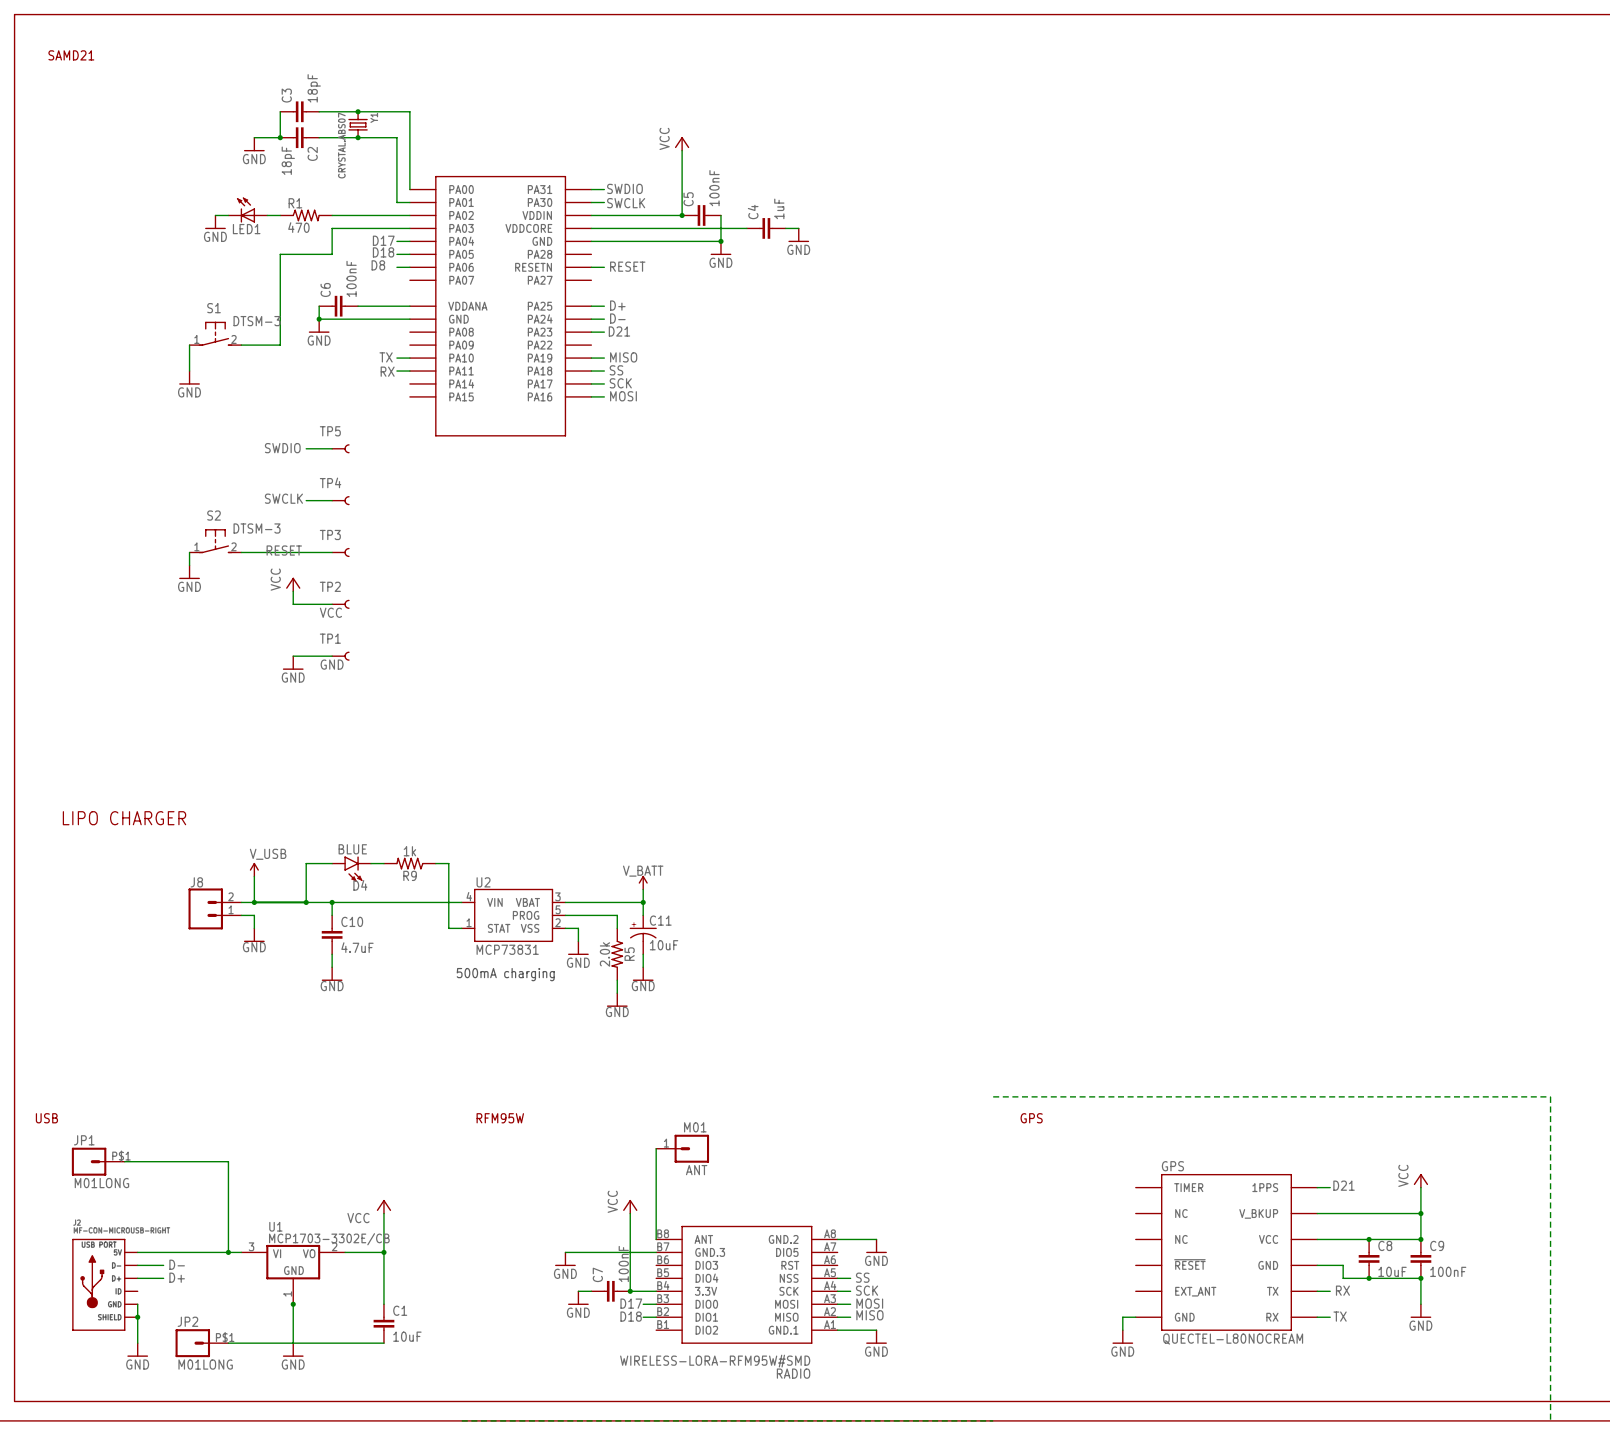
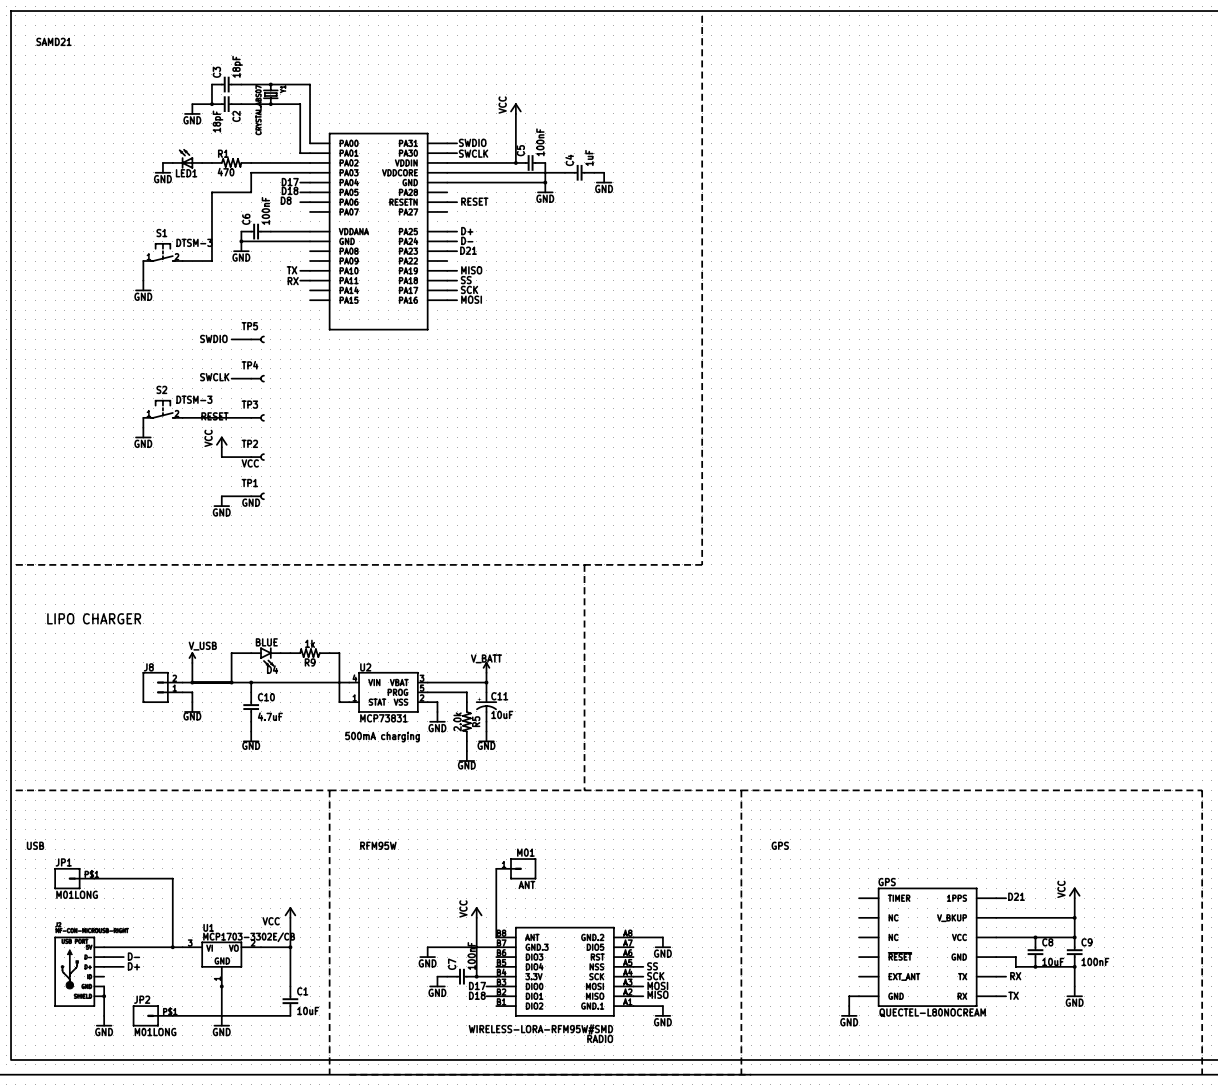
line: none -> (702, 15) (702, 564) (15, 564)
line: none -> (584, 564) (584, 790)
line: none -> (15, 790) (1202, 790) (1202, 1074)
line: none -> (329, 790) (329, 1074)
line: none -> (741, 790) (741, 1074)
wire: (993, 1096) (1550, 1096) (1550, 1420) -> none

